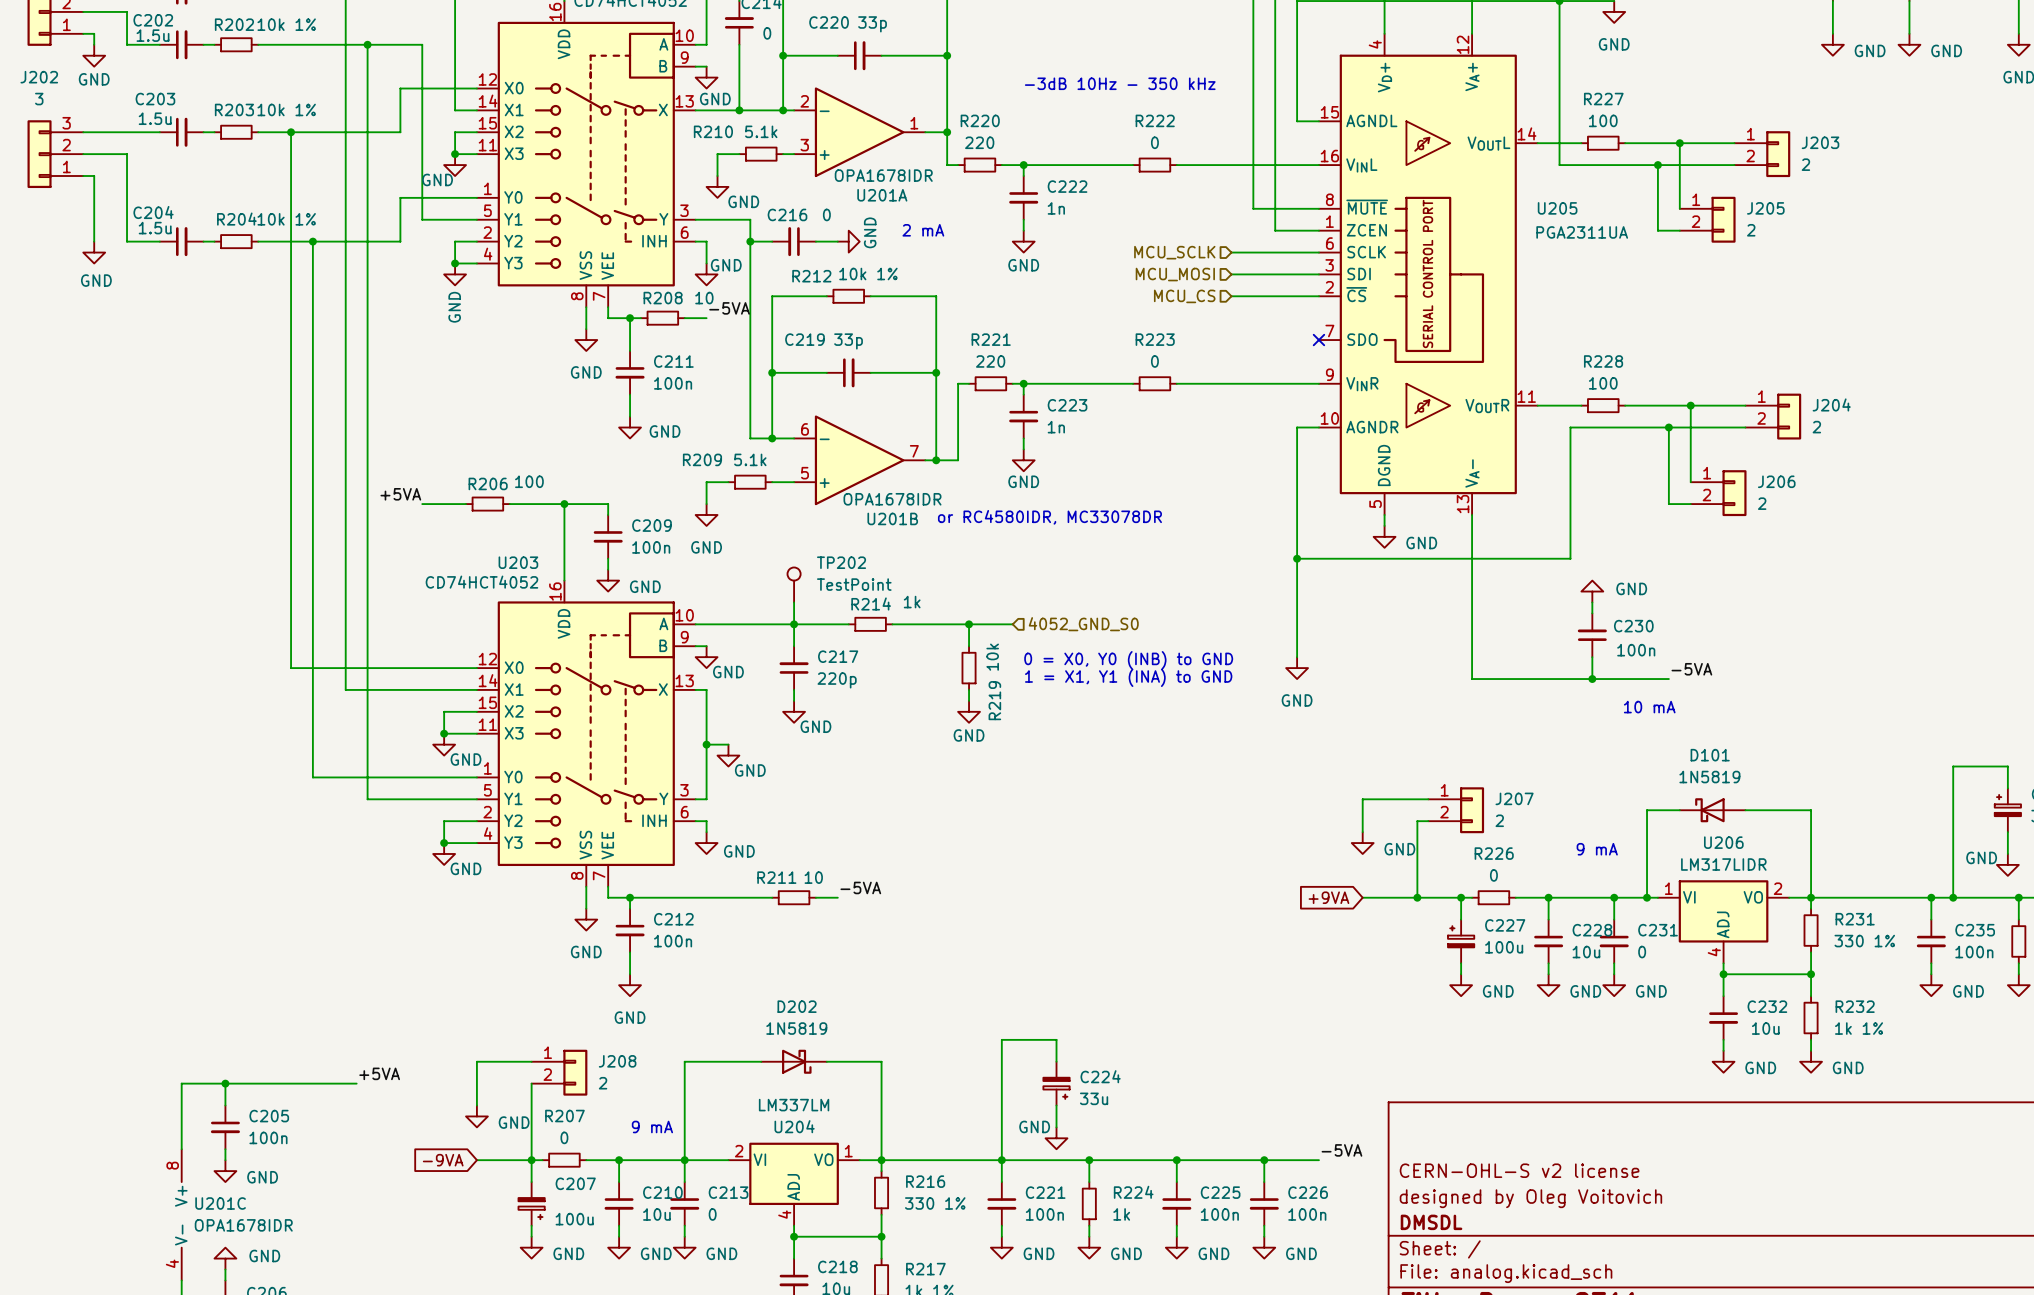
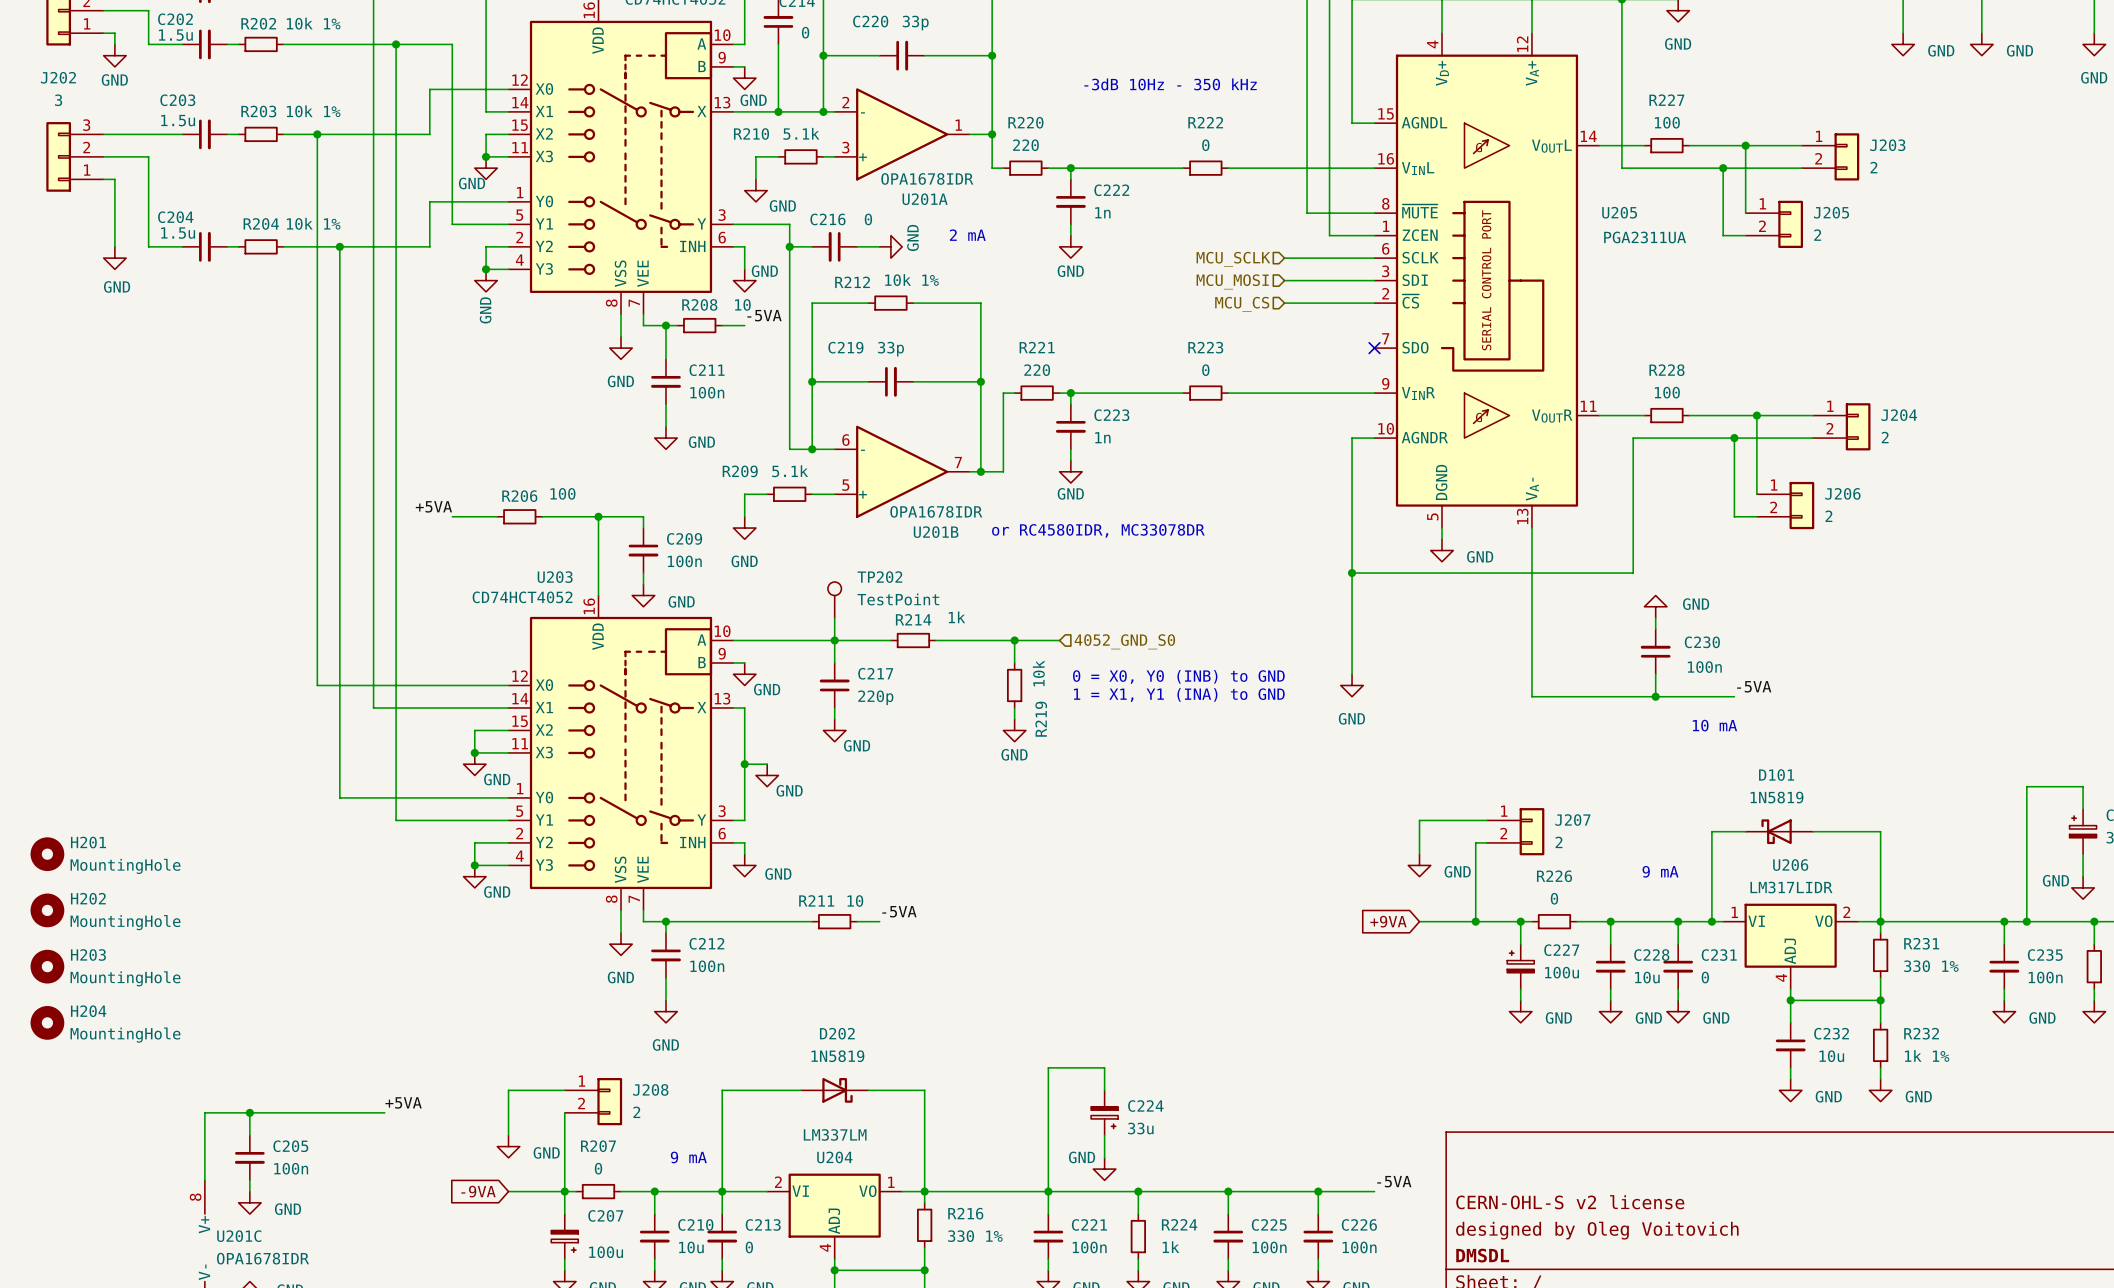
H201: none -> MountingHole (47, 854)
H202: none -> MountingHole (47, 910)
H203: none -> MountingHole (47, 966)
H204: none -> MountingHole (47, 1022)

